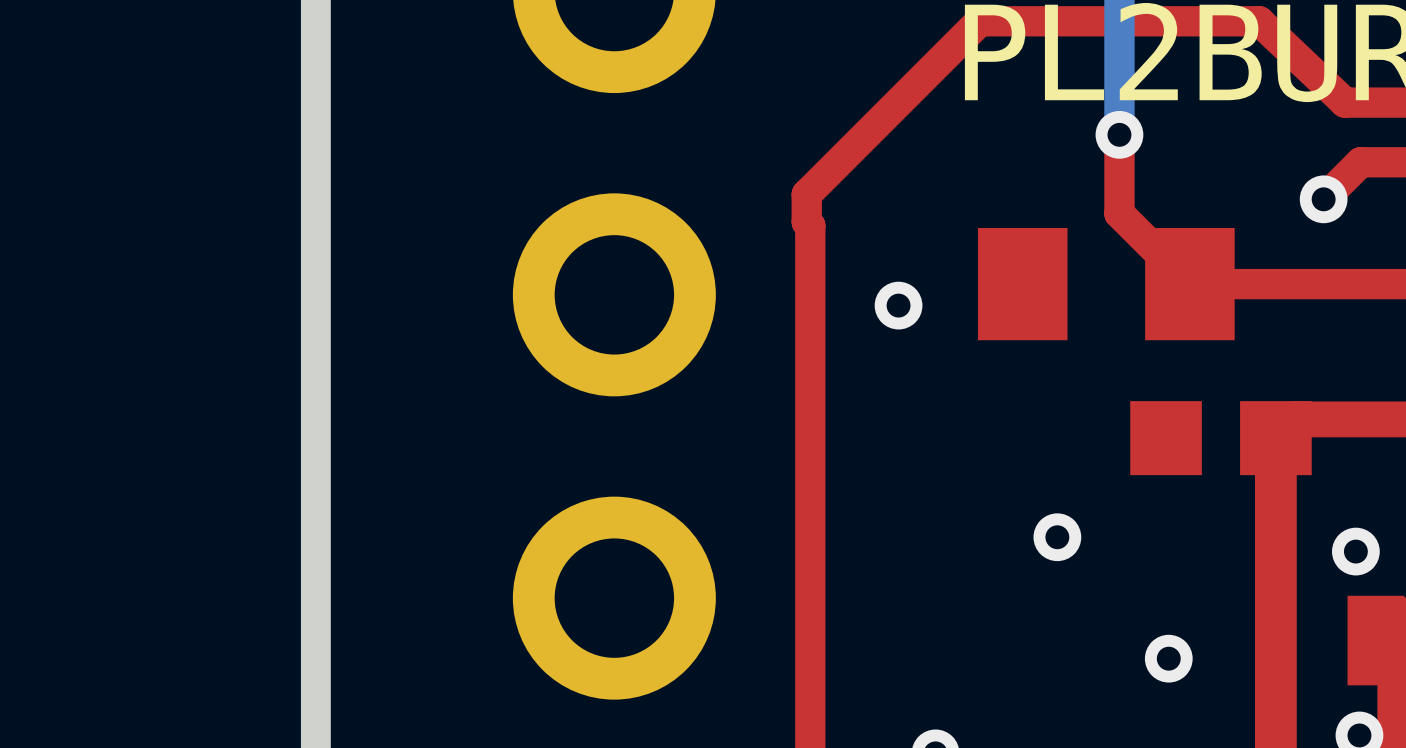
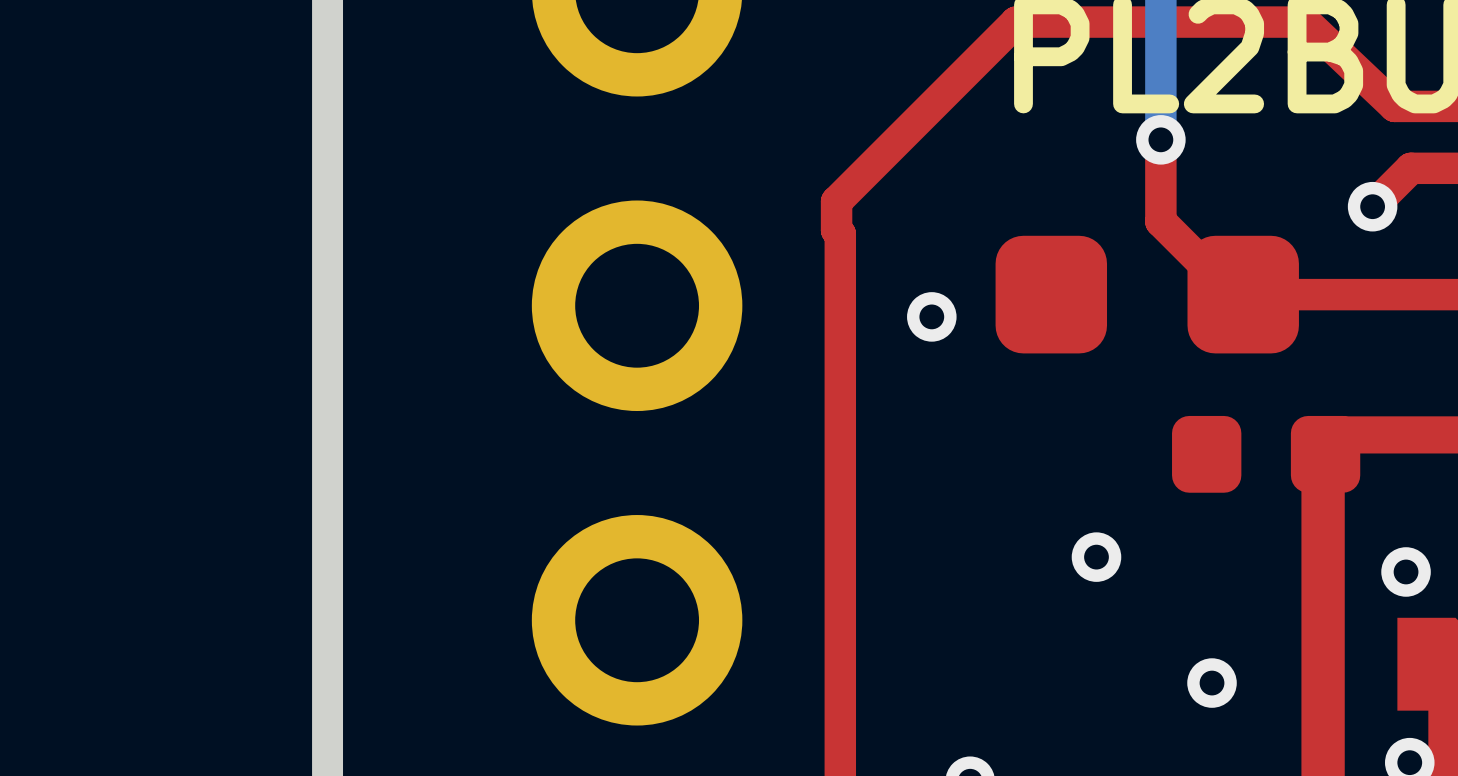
part footprint: [977, 227, 1235, 341] -> [995, 235, 1299, 354]
part footprint: [1130, 401, 1312, 476] -> [1172, 415, 1361, 493]

